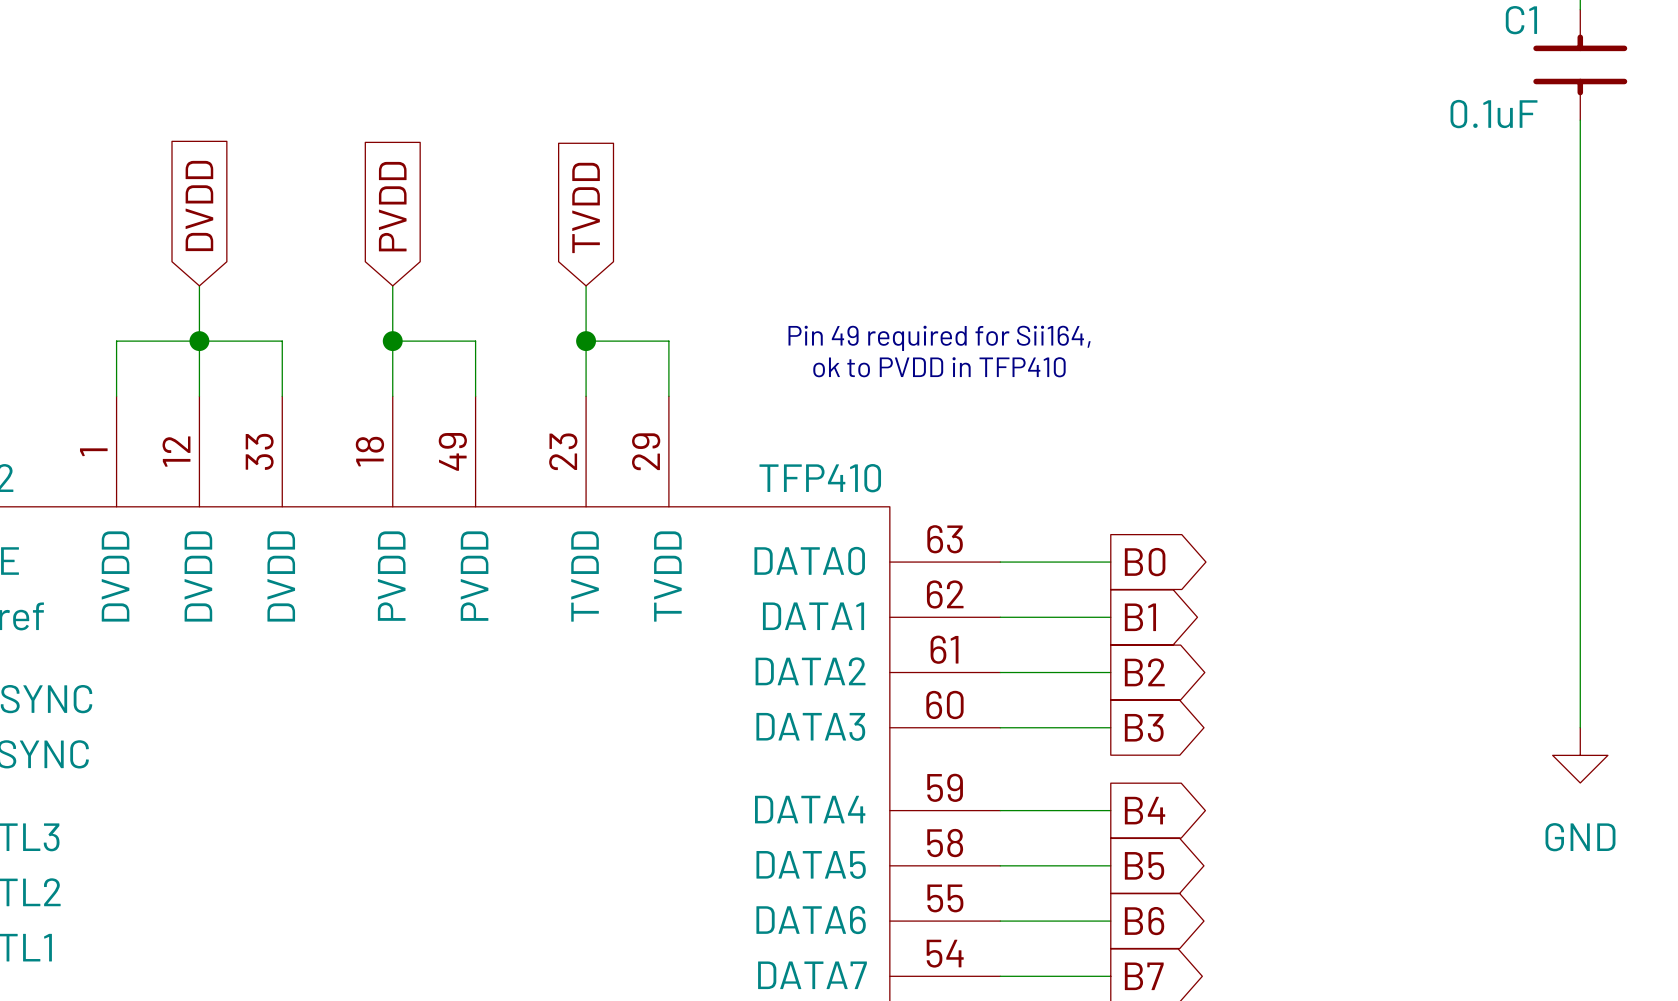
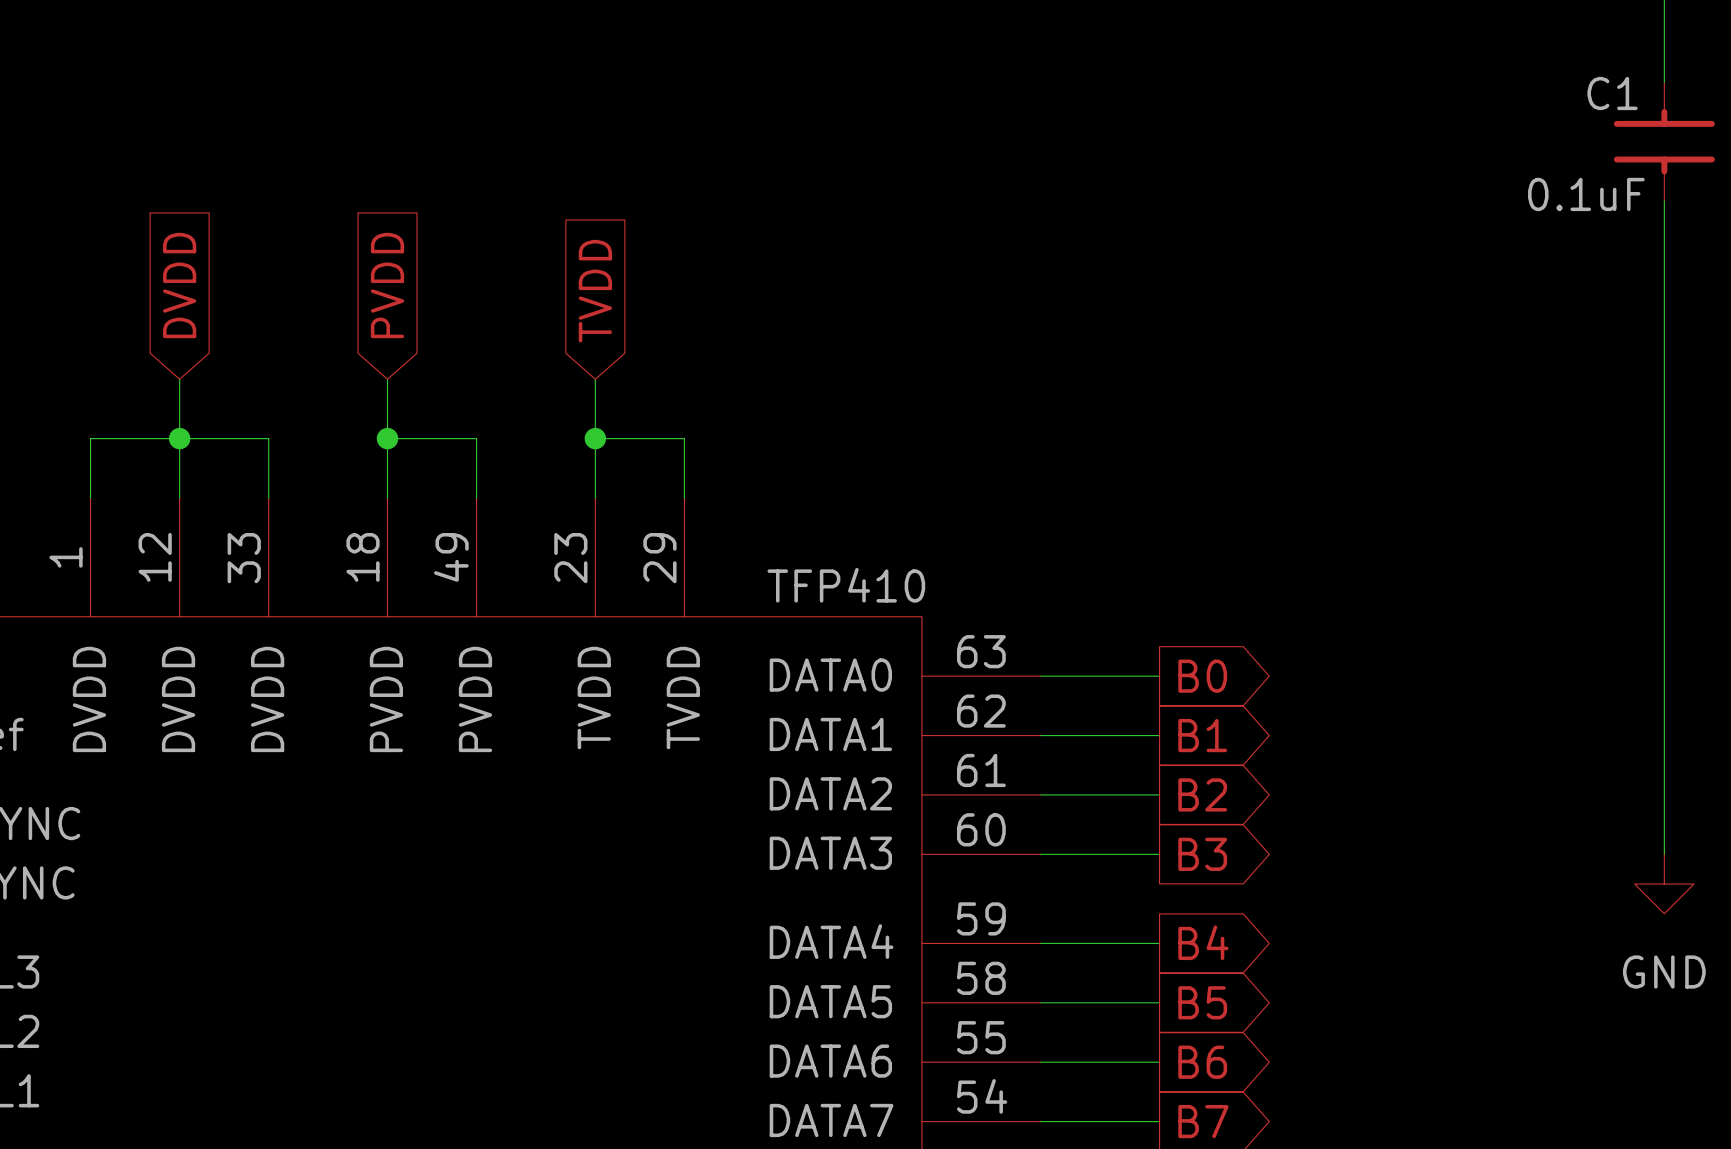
text: Pin 49 required for Sii164, (939, 338) -> none
text: ok to PVDD in TFP410 (939, 367) -> none

